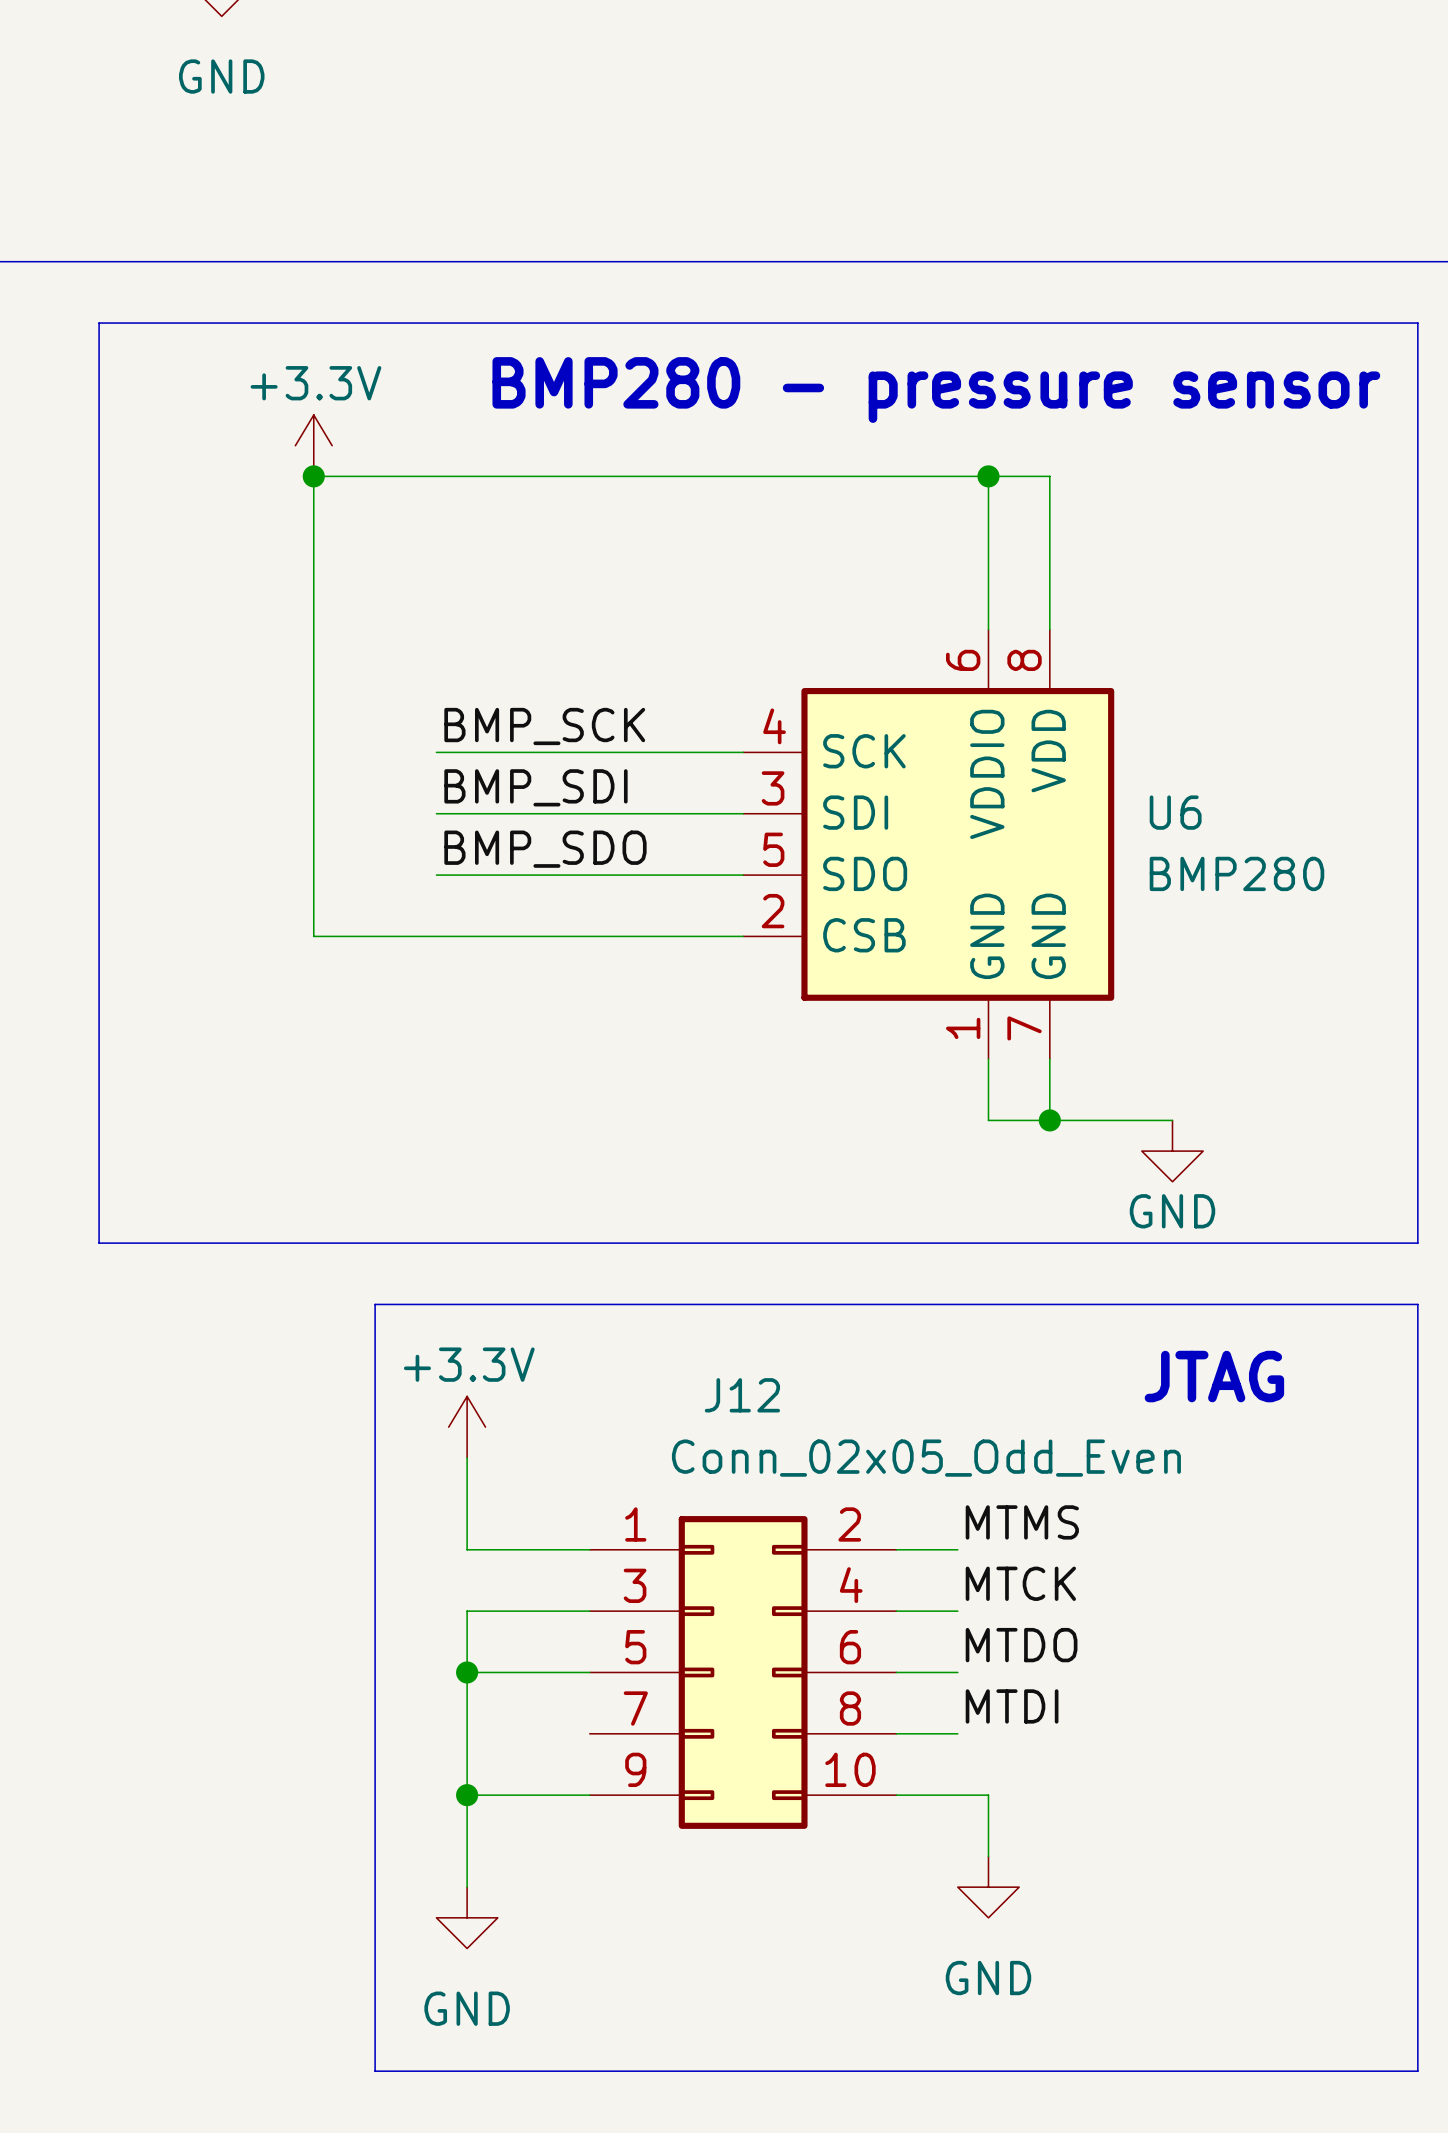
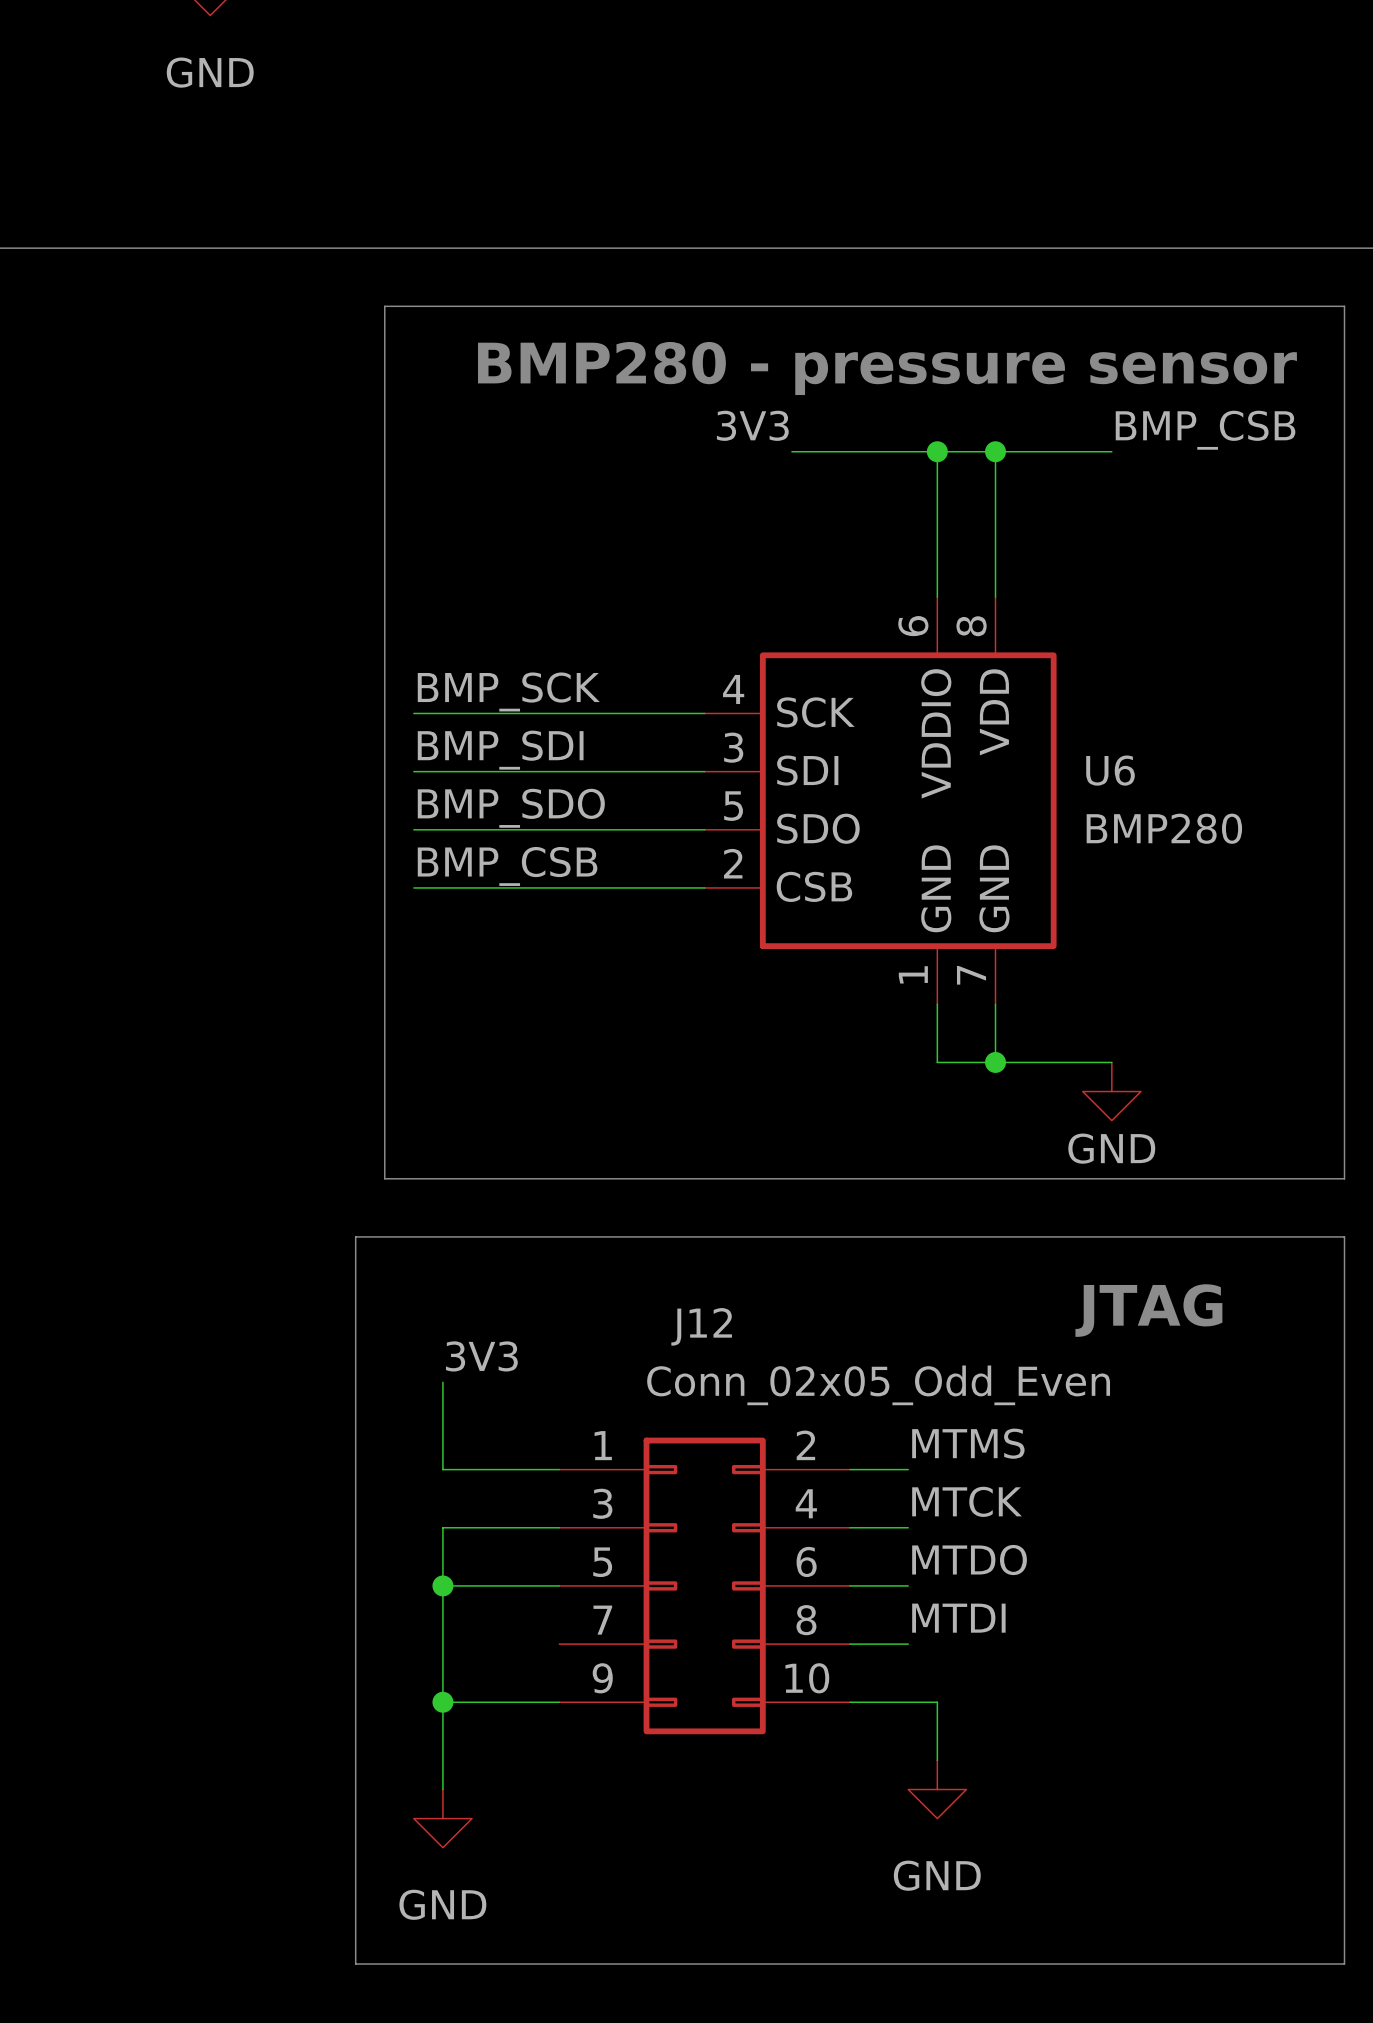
line: (405, 323) (99, 323) (99, 1243) (405, 1243) -> (384, 306) (384, 1178)
power symbol: +3.3V (313, 445) -> none
label: none -> 3V3 (752, 425)
label: none -> BMP_CSB (1205, 430)
junction: (313, 476) -> none
wire: (835, 476) (313, 476) (313, 936) (436, 936) -> none
wire: none -> (995, 451) (1111, 451)
junction: none -> (995, 451)
label: none -> BMP_CSB (507, 866)
power symbol: +3.3V (467, 1427) -> none
label: none -> 3V3 (481, 1356)

